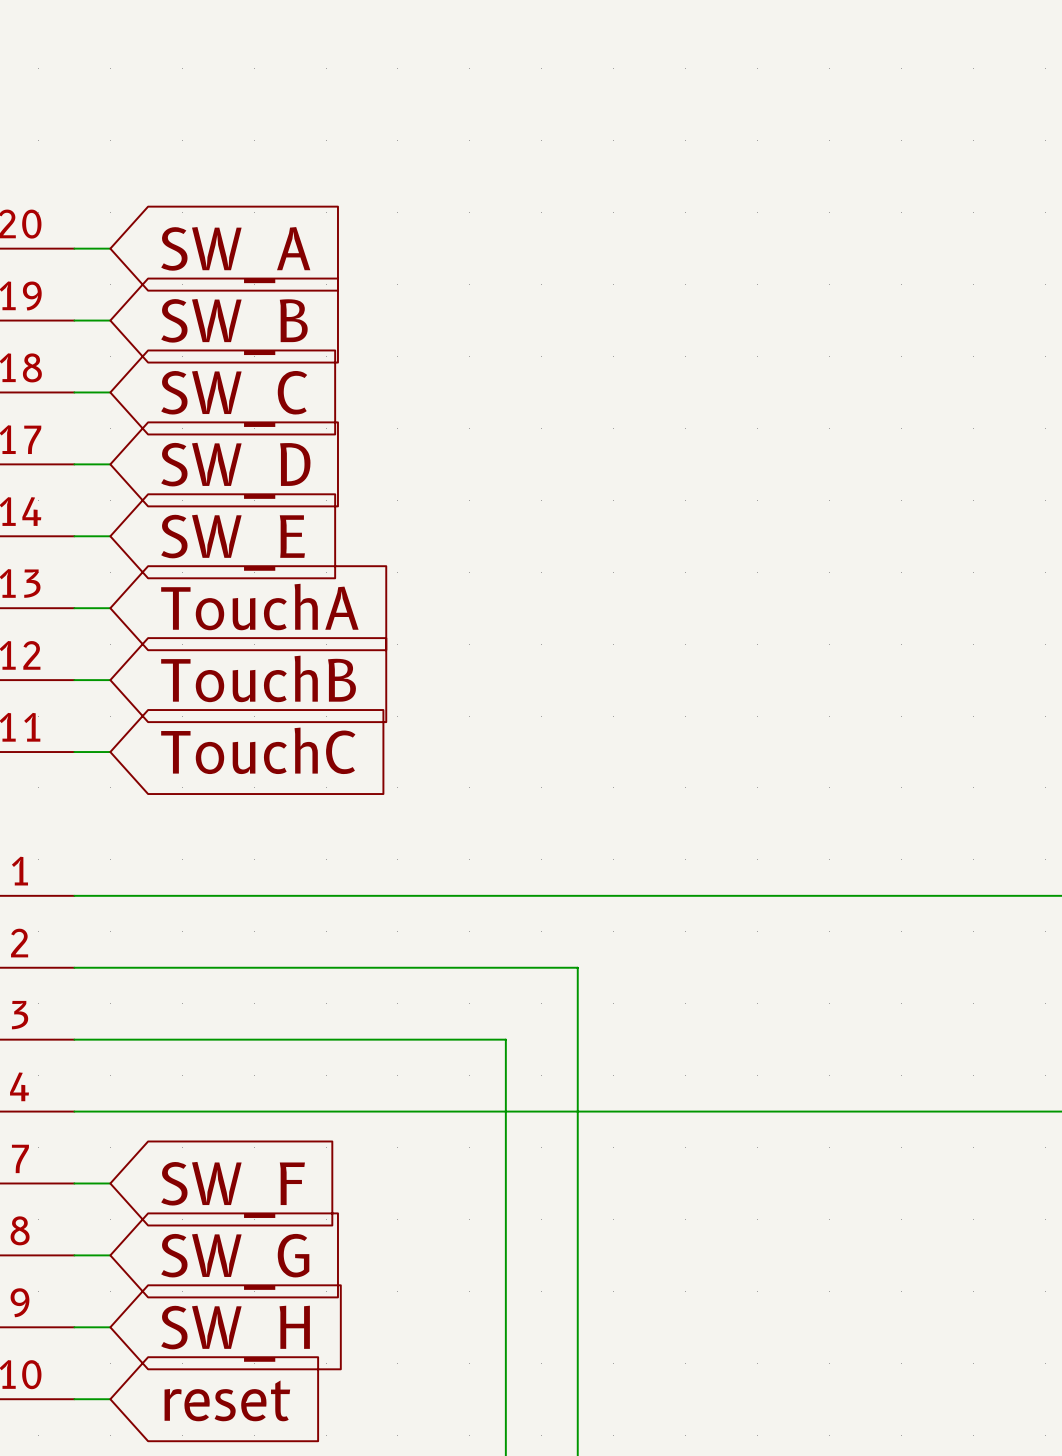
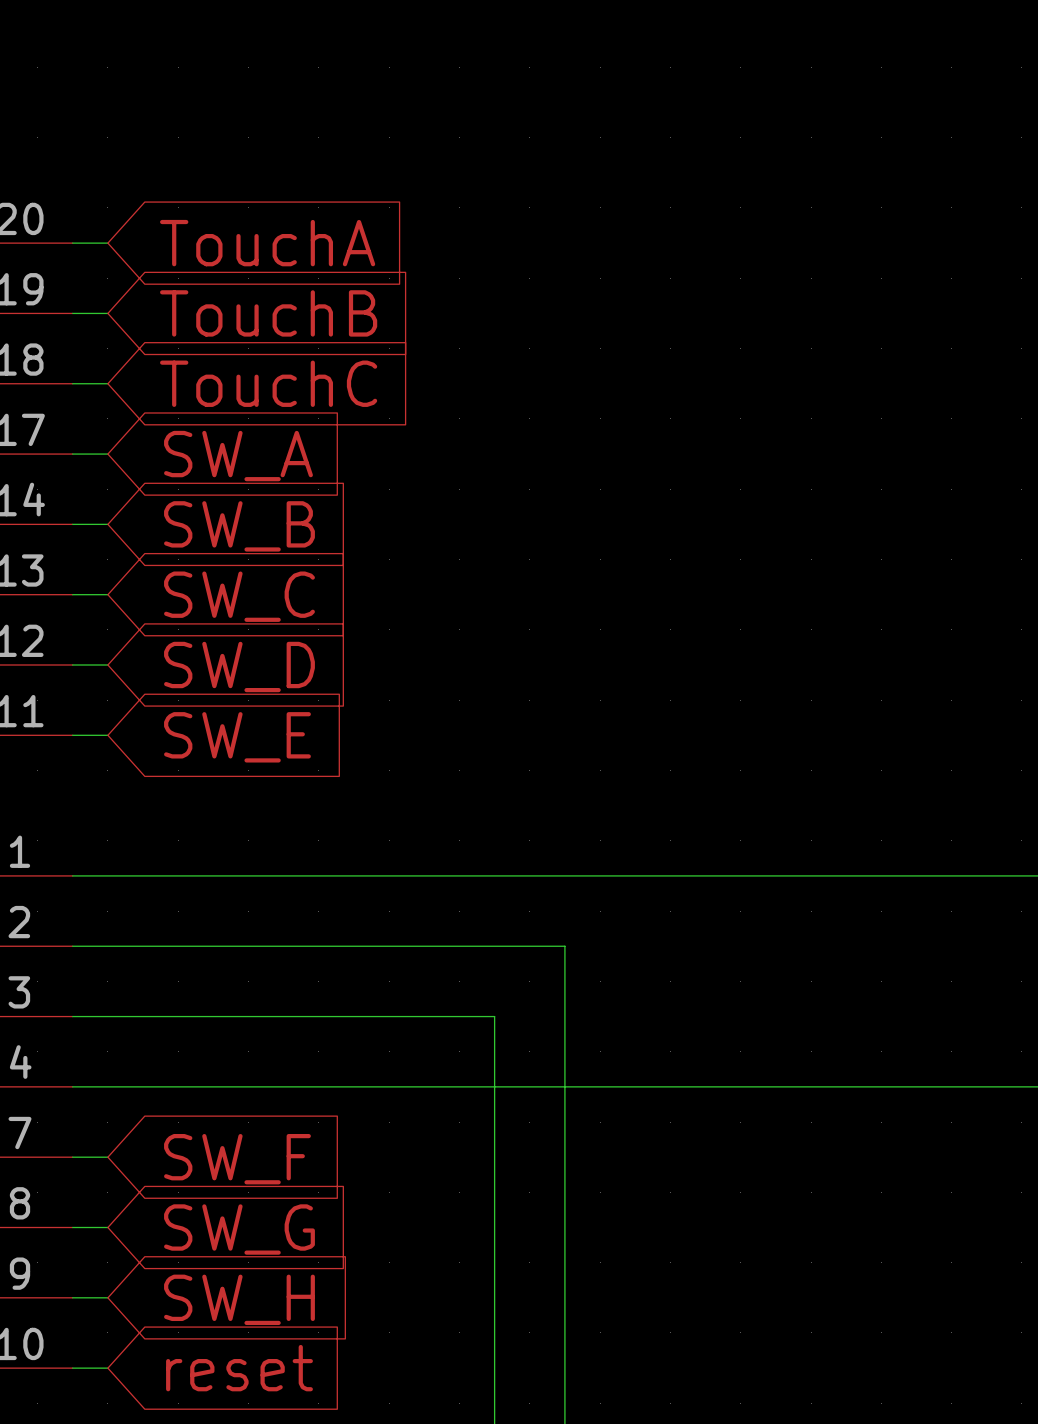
global label: SW_A (235, 255) -> TouchA (267, 243)
global label: SW_B (234, 327) -> TouchB (268, 313)
global label: SW_C (234, 398) -> TouchC (268, 383)
global label: SW_D (235, 470) -> SW_A (238, 456)
global label: SW_E (233, 542) -> SW_B (239, 526)
global label: TouchA (259, 607) -> SW_C (239, 596)
global label: TouchB (258, 678) -> SW_D (239, 667)
global label: TouchC (258, 750) -> SW_E (237, 737)

